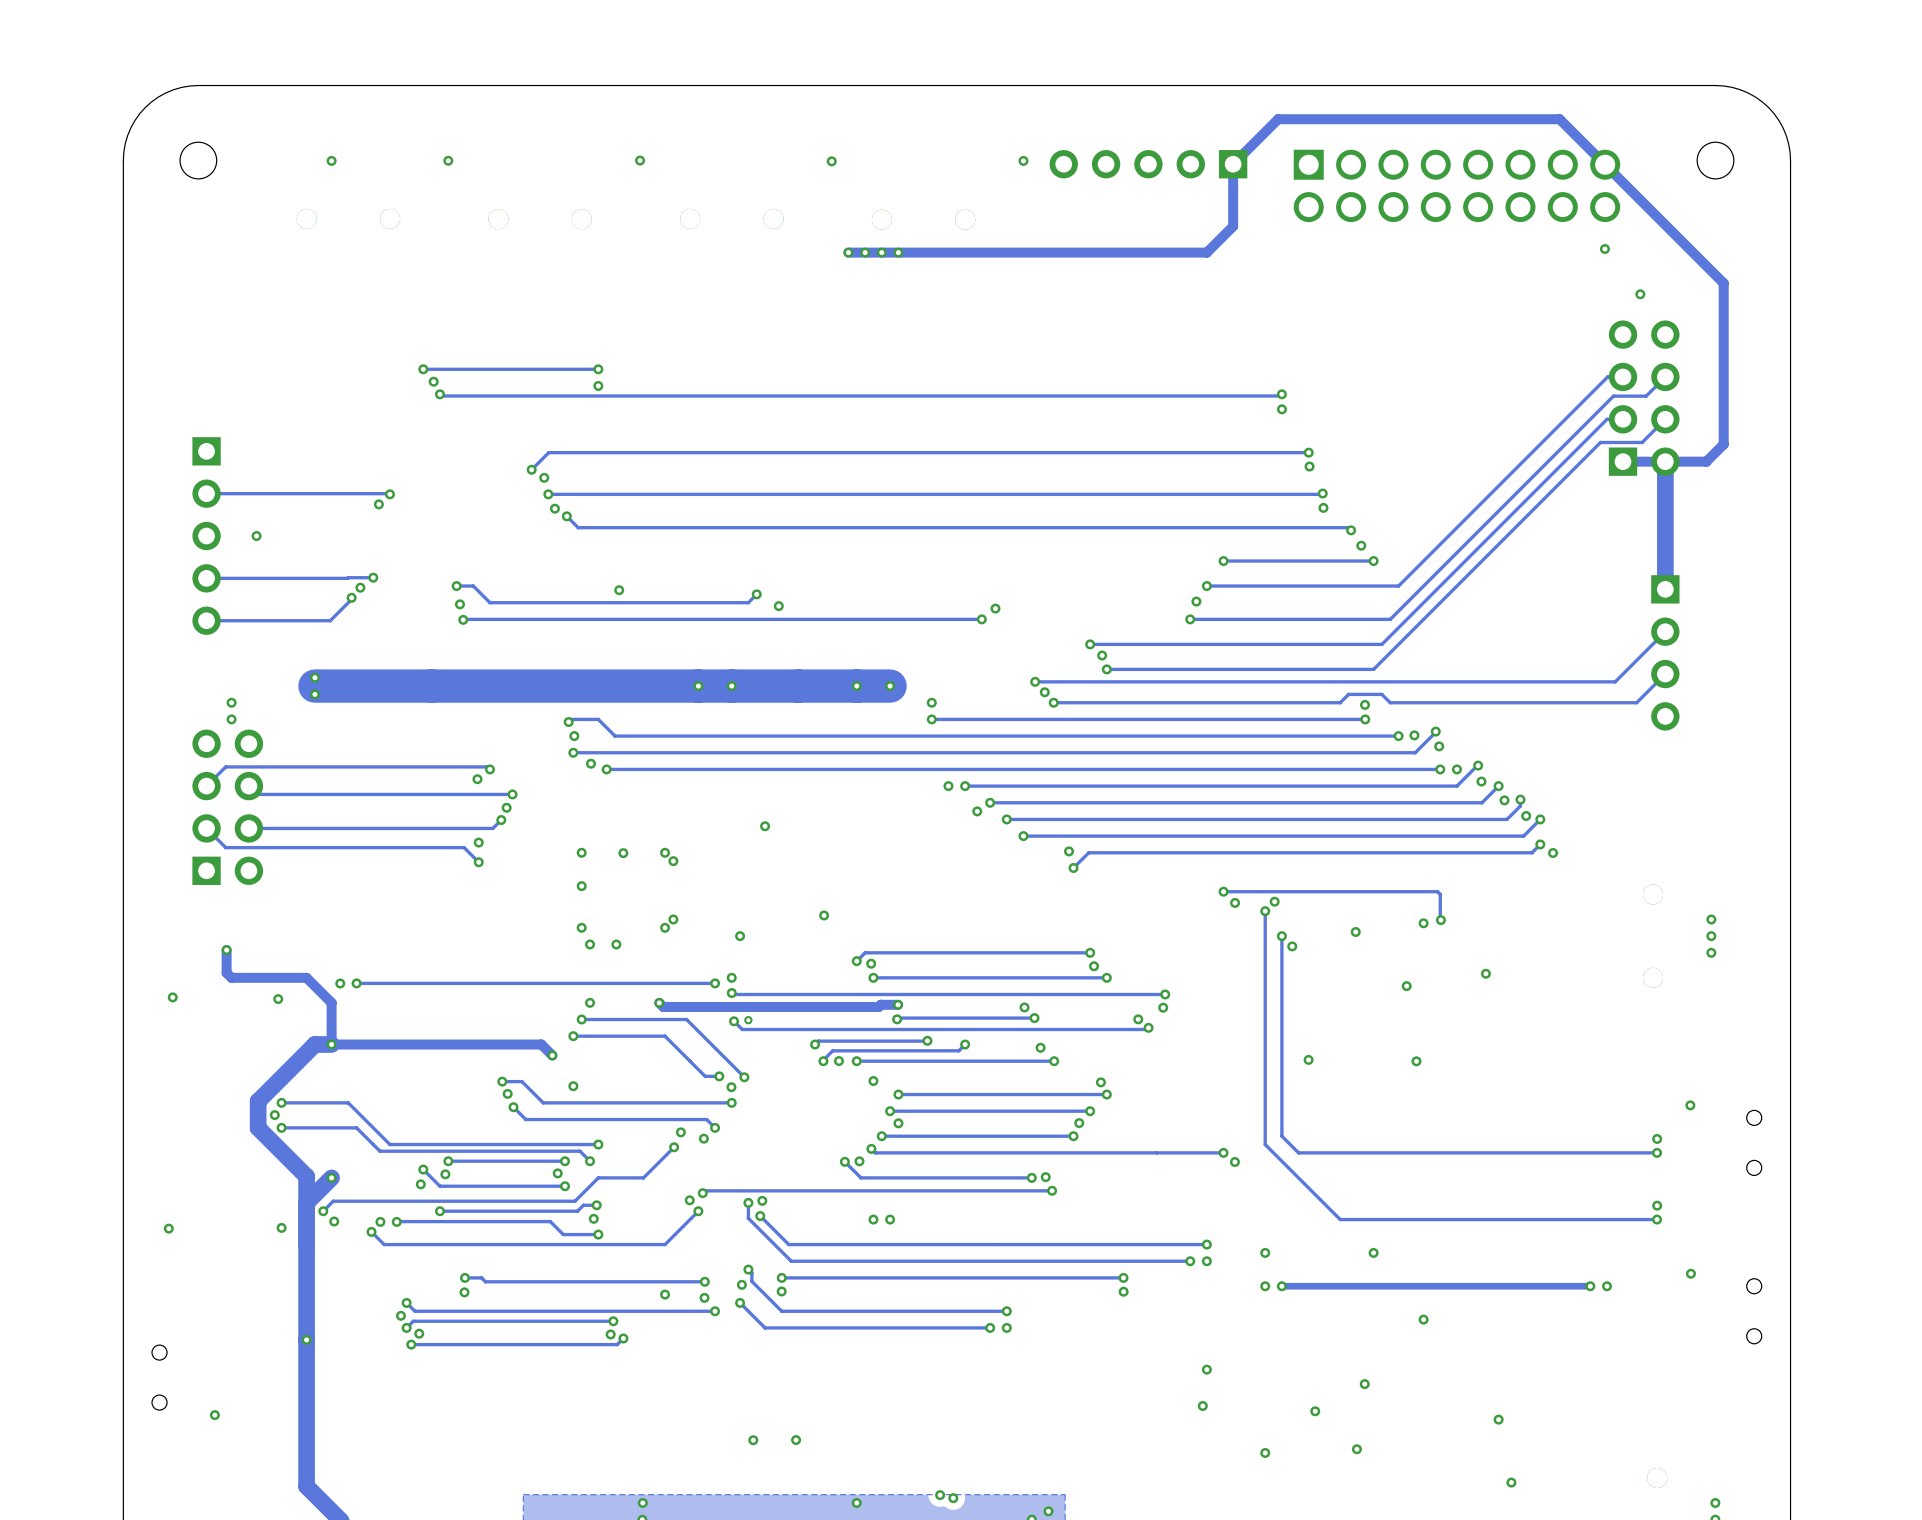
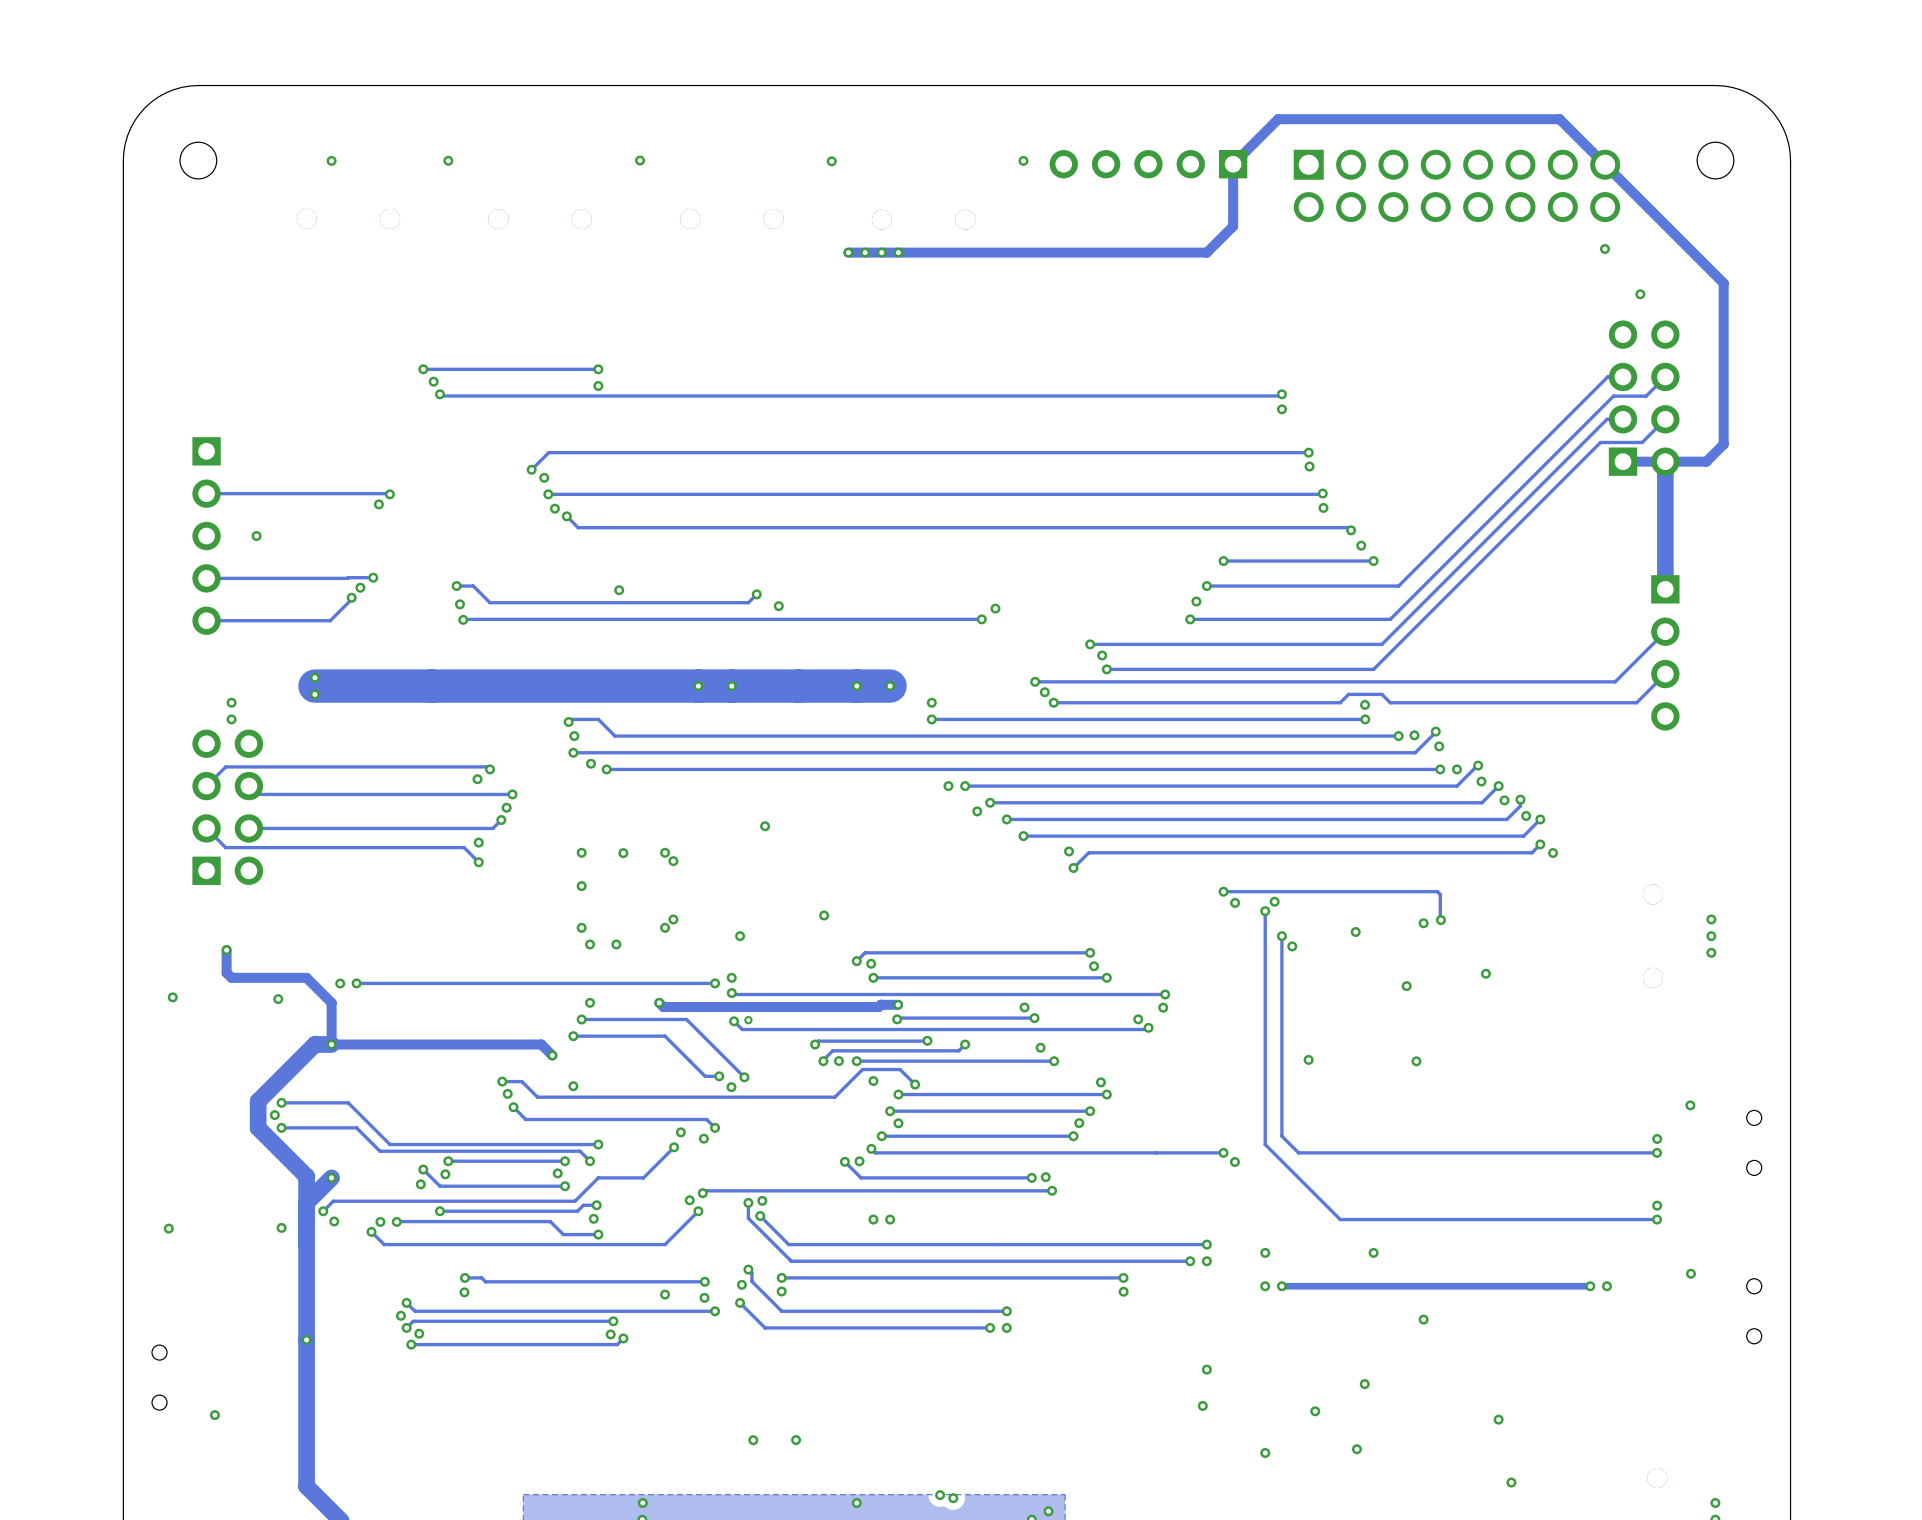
via: none -> (915, 1084)
track: (537, 1097) (543, 1102) (731, 1102) -> (537, 1097) (834, 1097) (862, 1069) (900, 1069) (915, 1084)
via: (731, 1102) -> none

